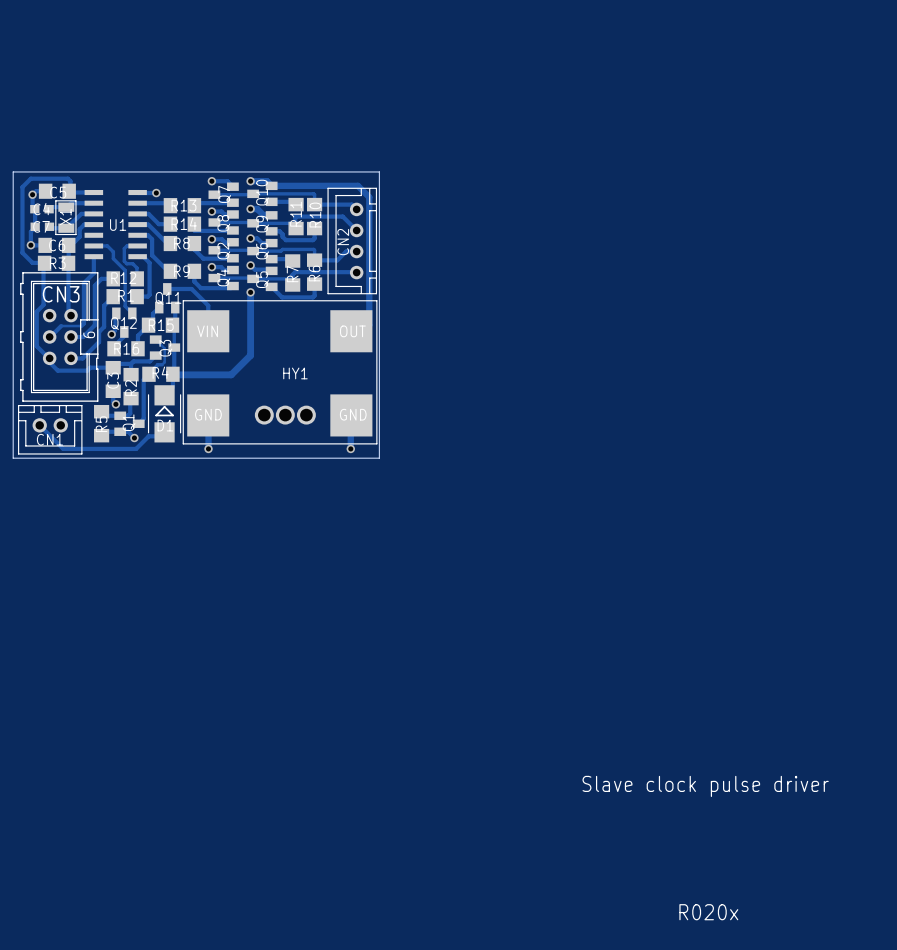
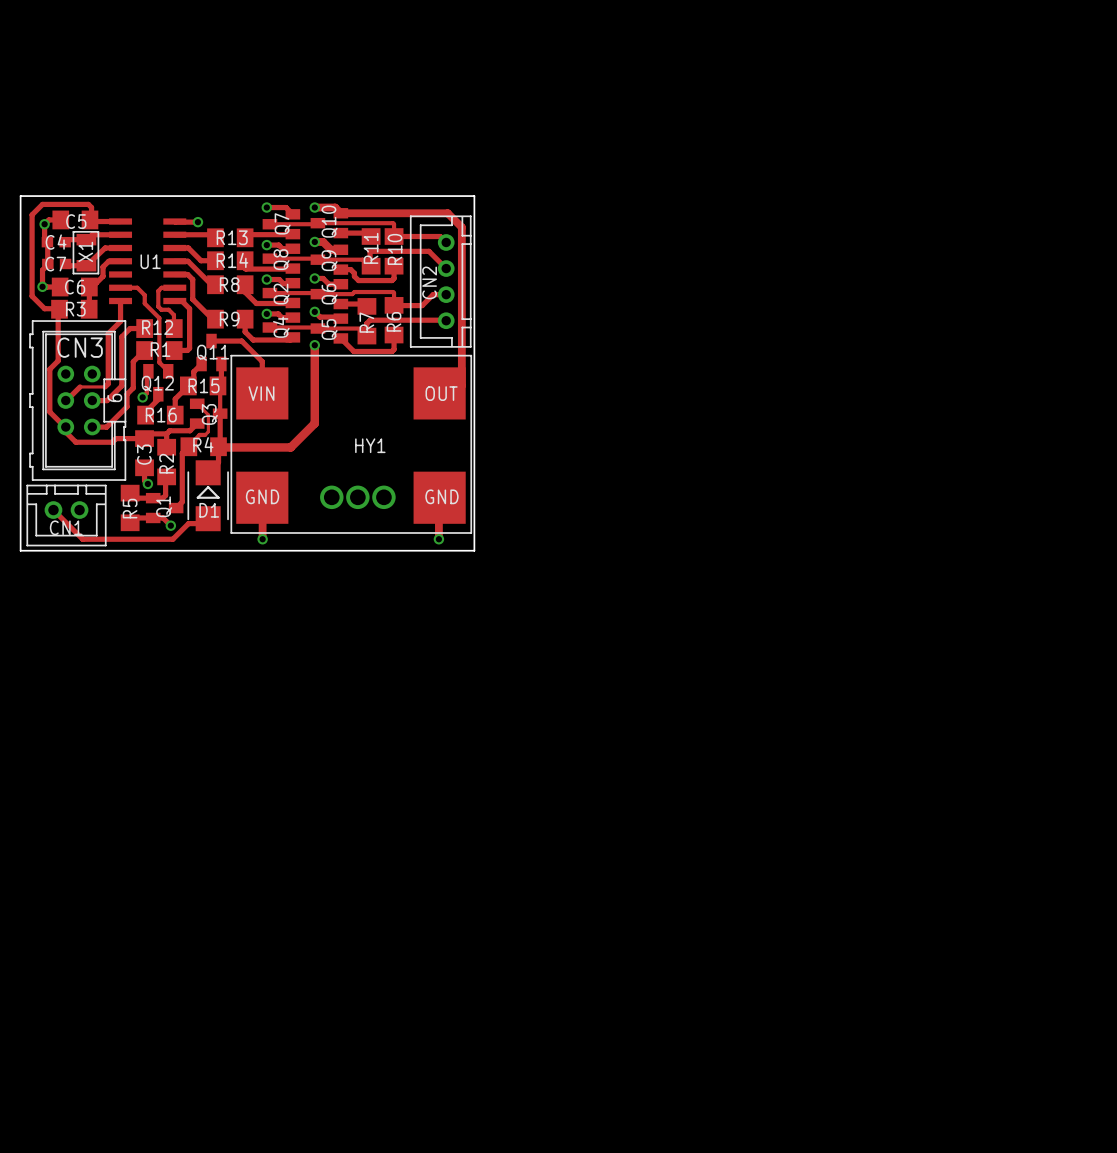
track: (68, 263) (68, 313) (71, 315) -> none
drawing: [582, 775, 829, 921] -> none

